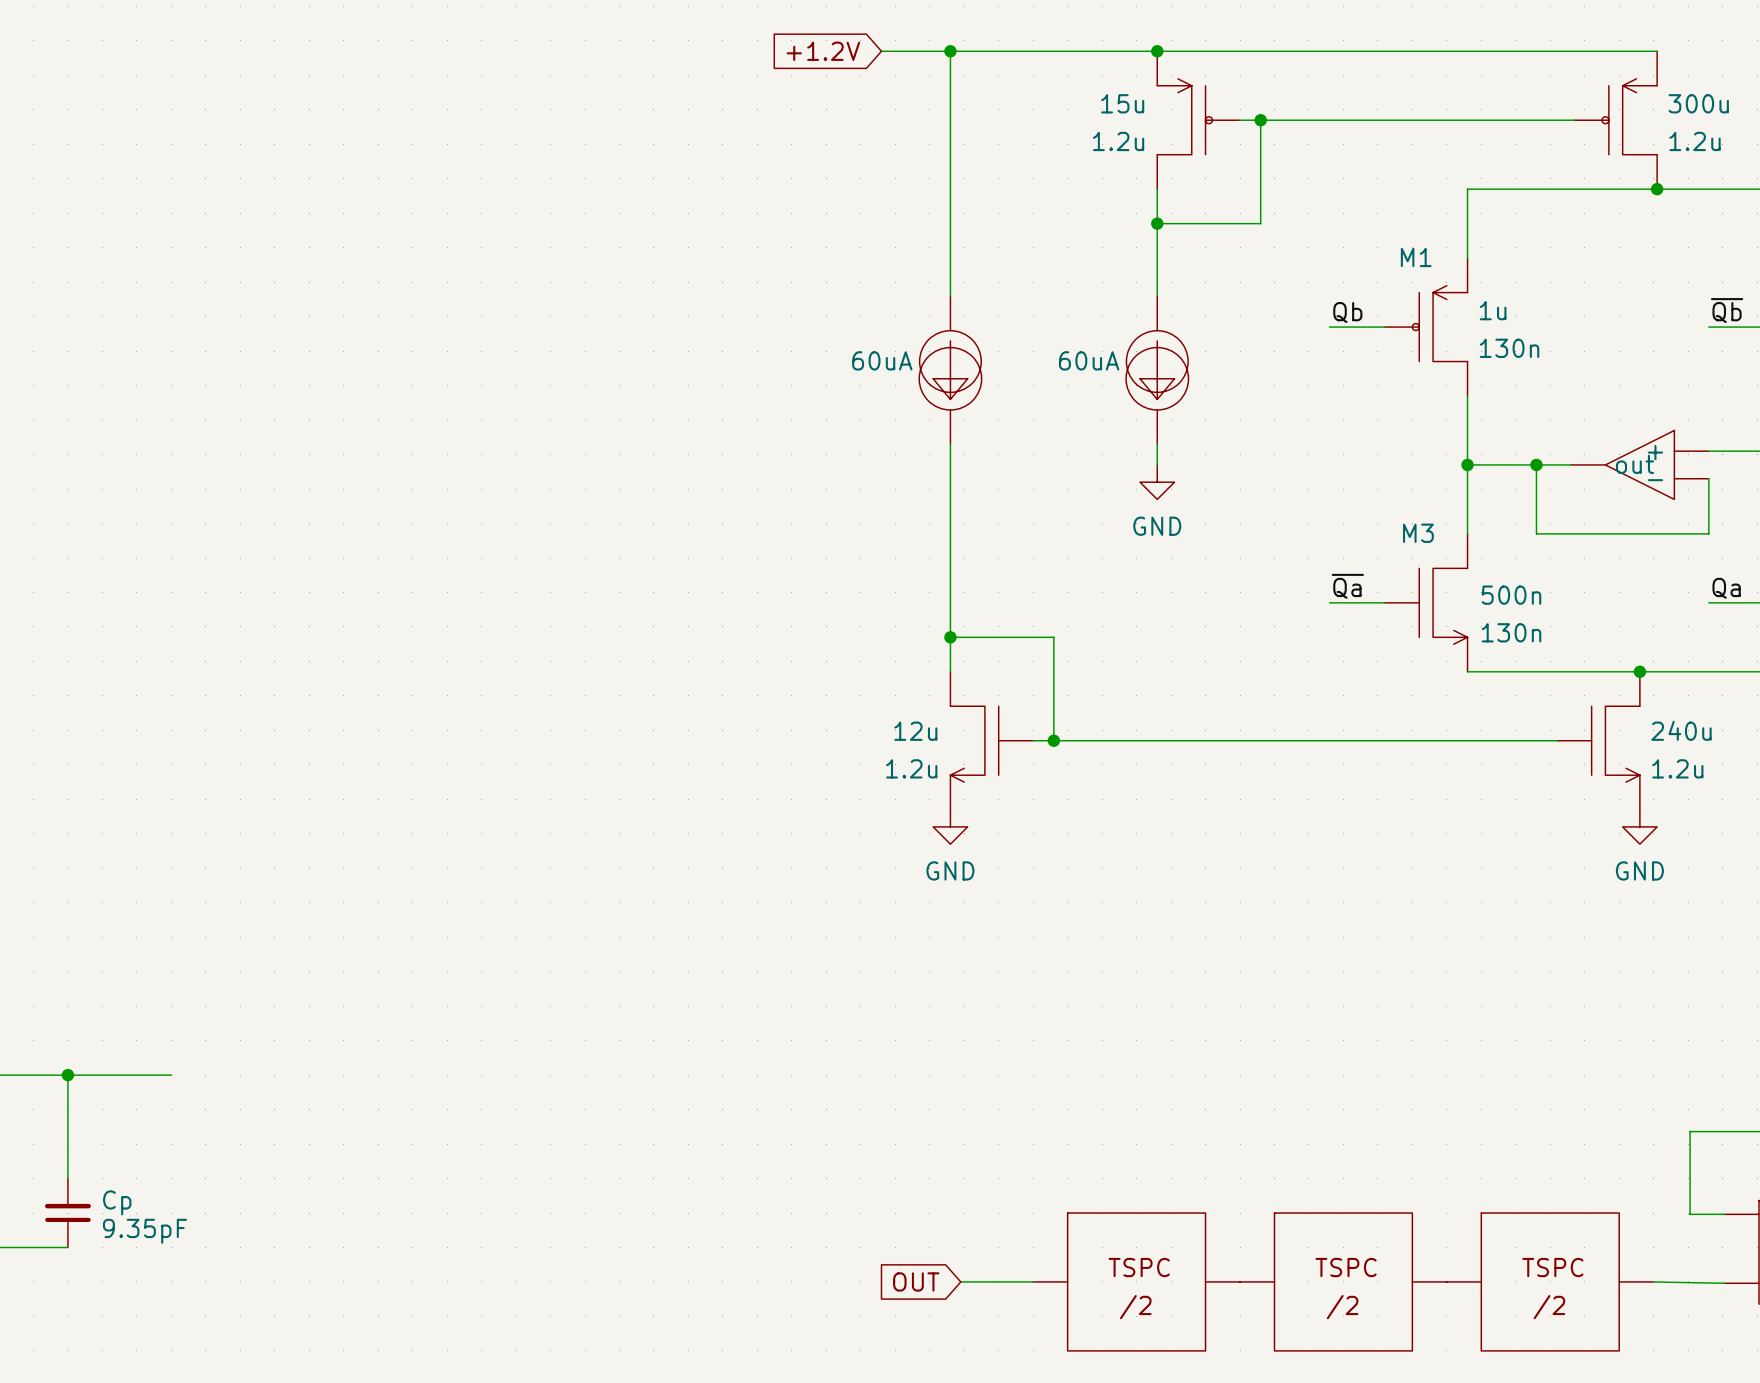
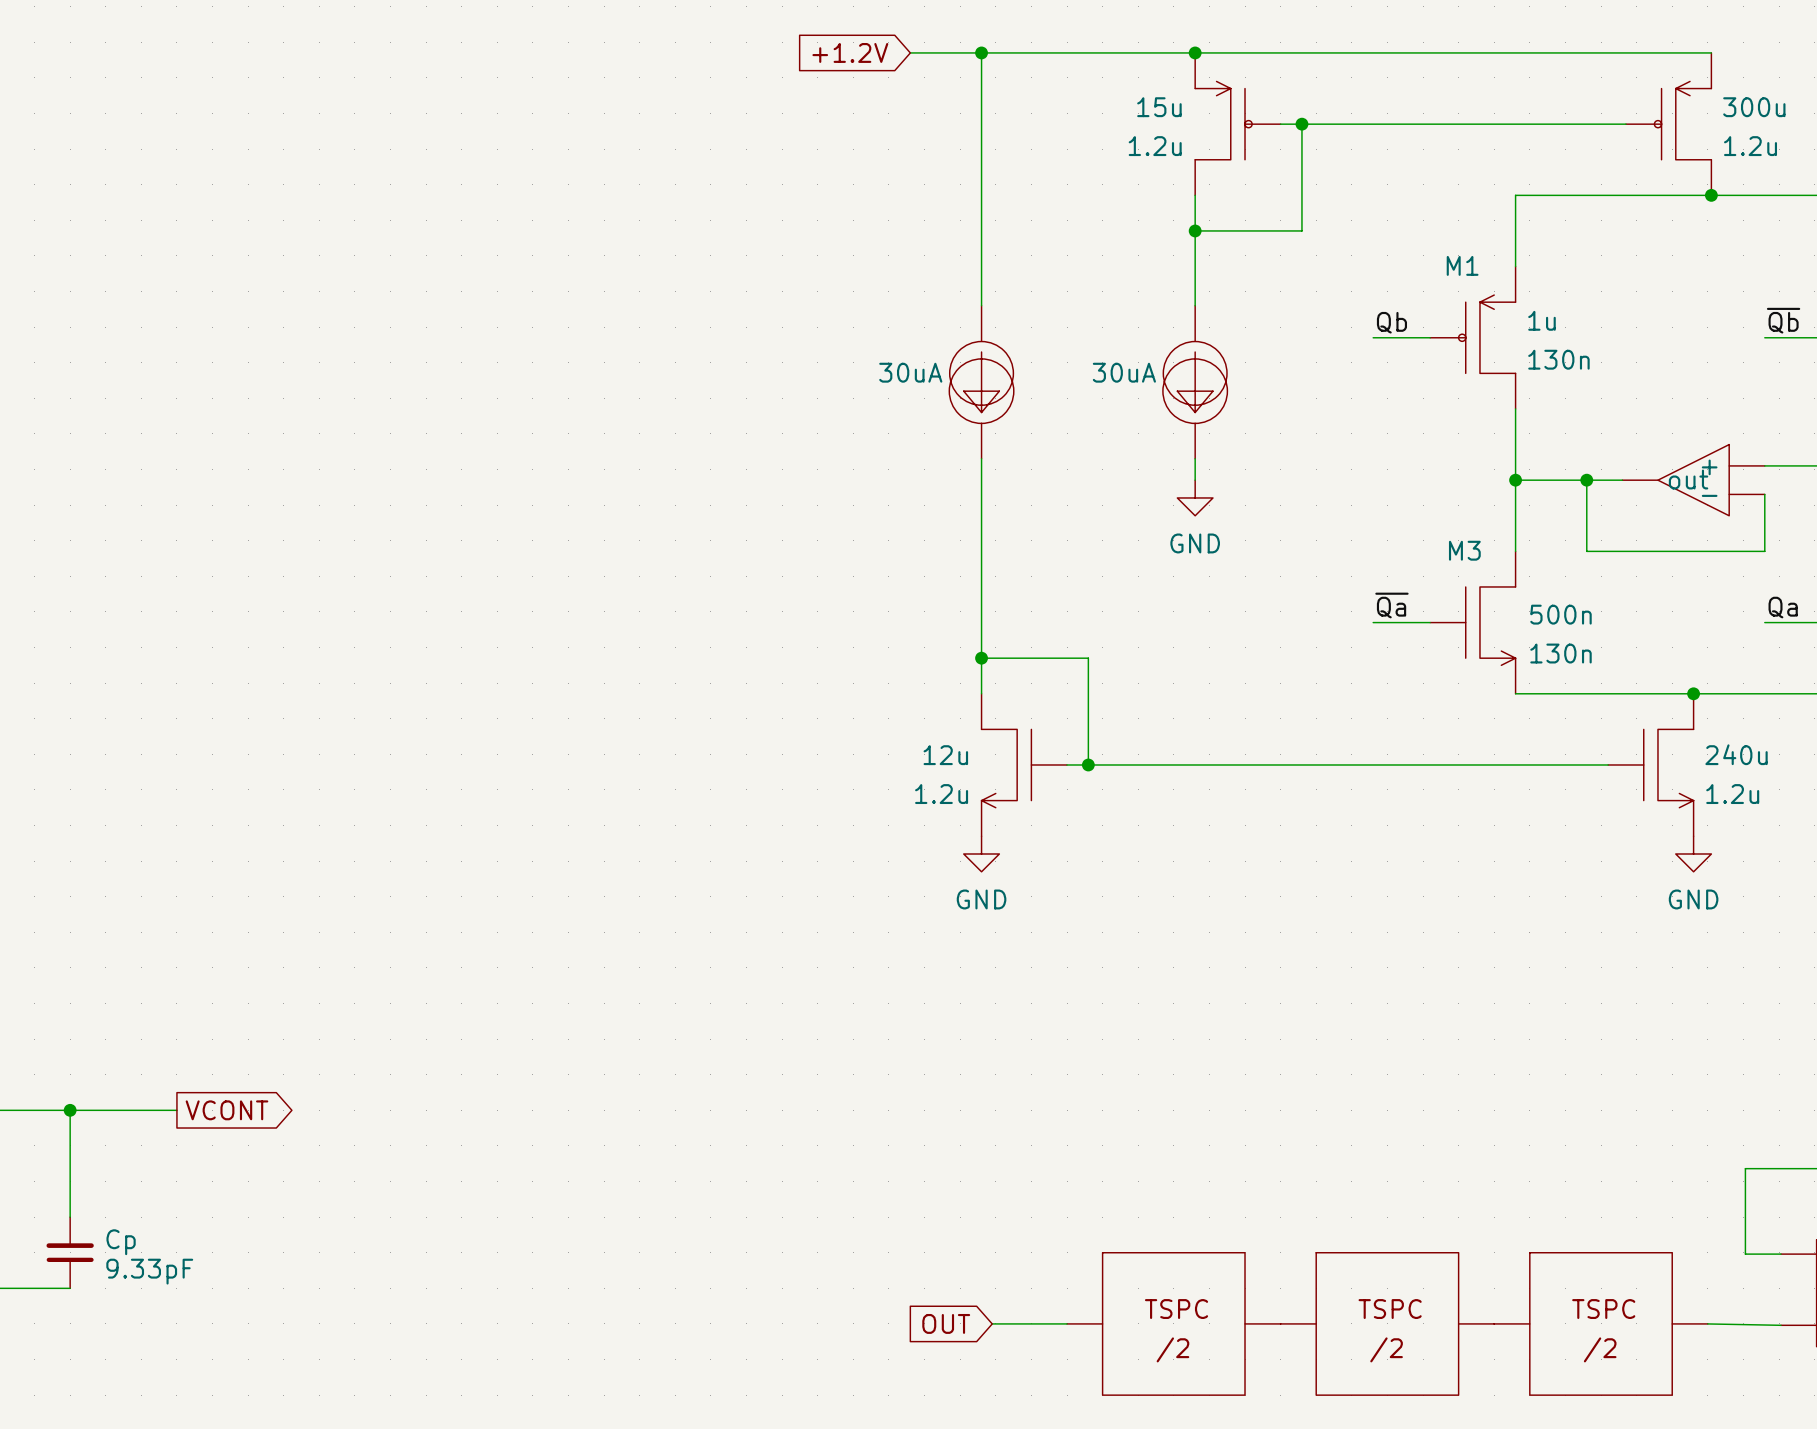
part value: 60uA (882, 360) -> 30uA (910, 372)
part value: 60uA (1089, 360) -> 30uA (1124, 372)
global label: none -> VCONT (226, 1110)
Cp value: 9.35pF (145, 1231) -> 9.33pF (149, 1271)

